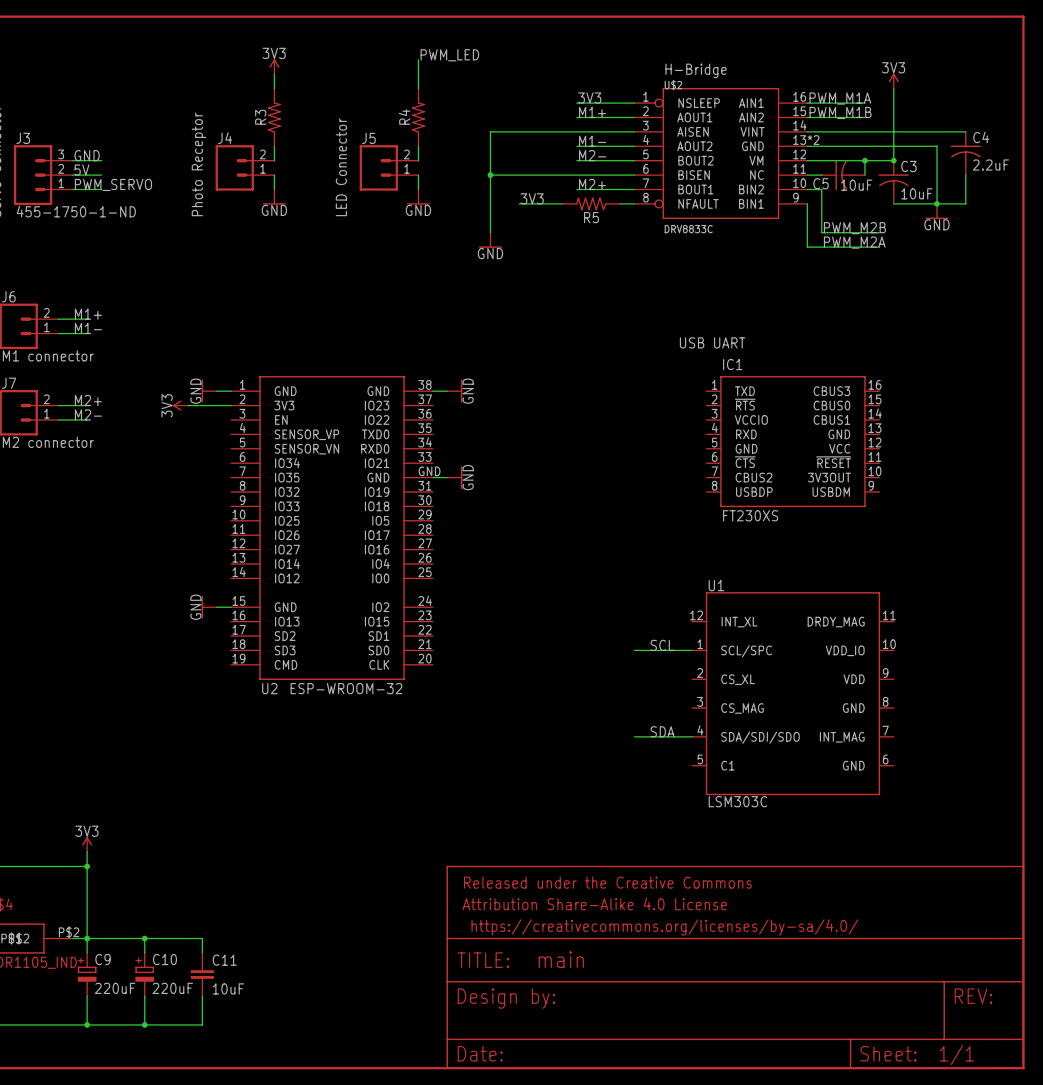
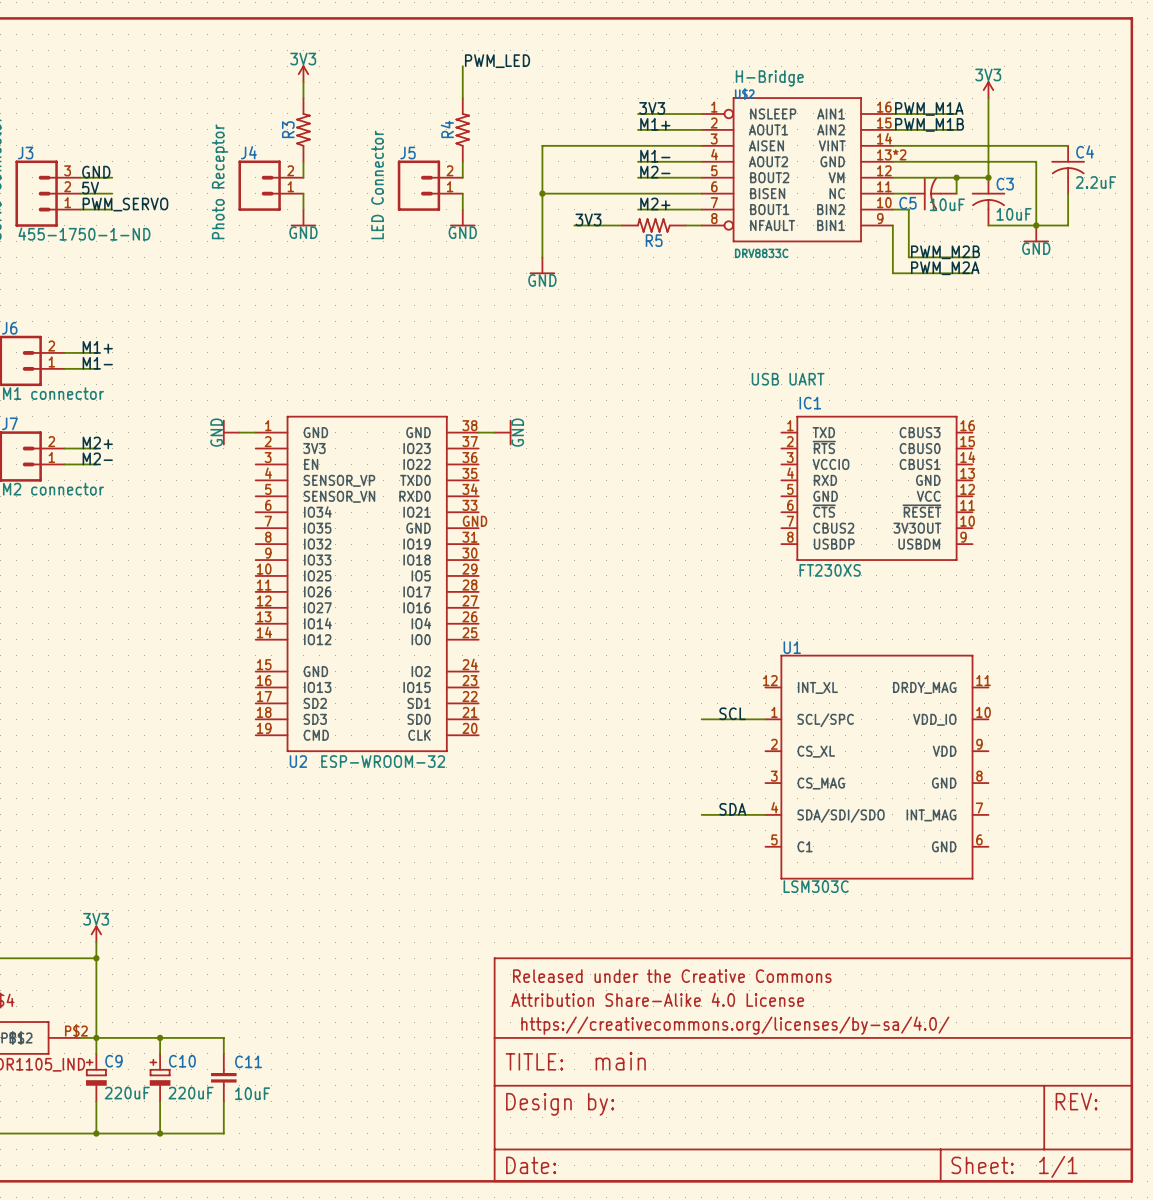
power symbol: 3V3 (180, 405) -> none
wire: (187, 405) (231, 405) -> none
wire: (432, 477) (447, 477) -> none
power symbol: GND (454, 477) -> none
power symbol: GND (209, 607) -> none
wire: (216, 607) (231, 607) -> none

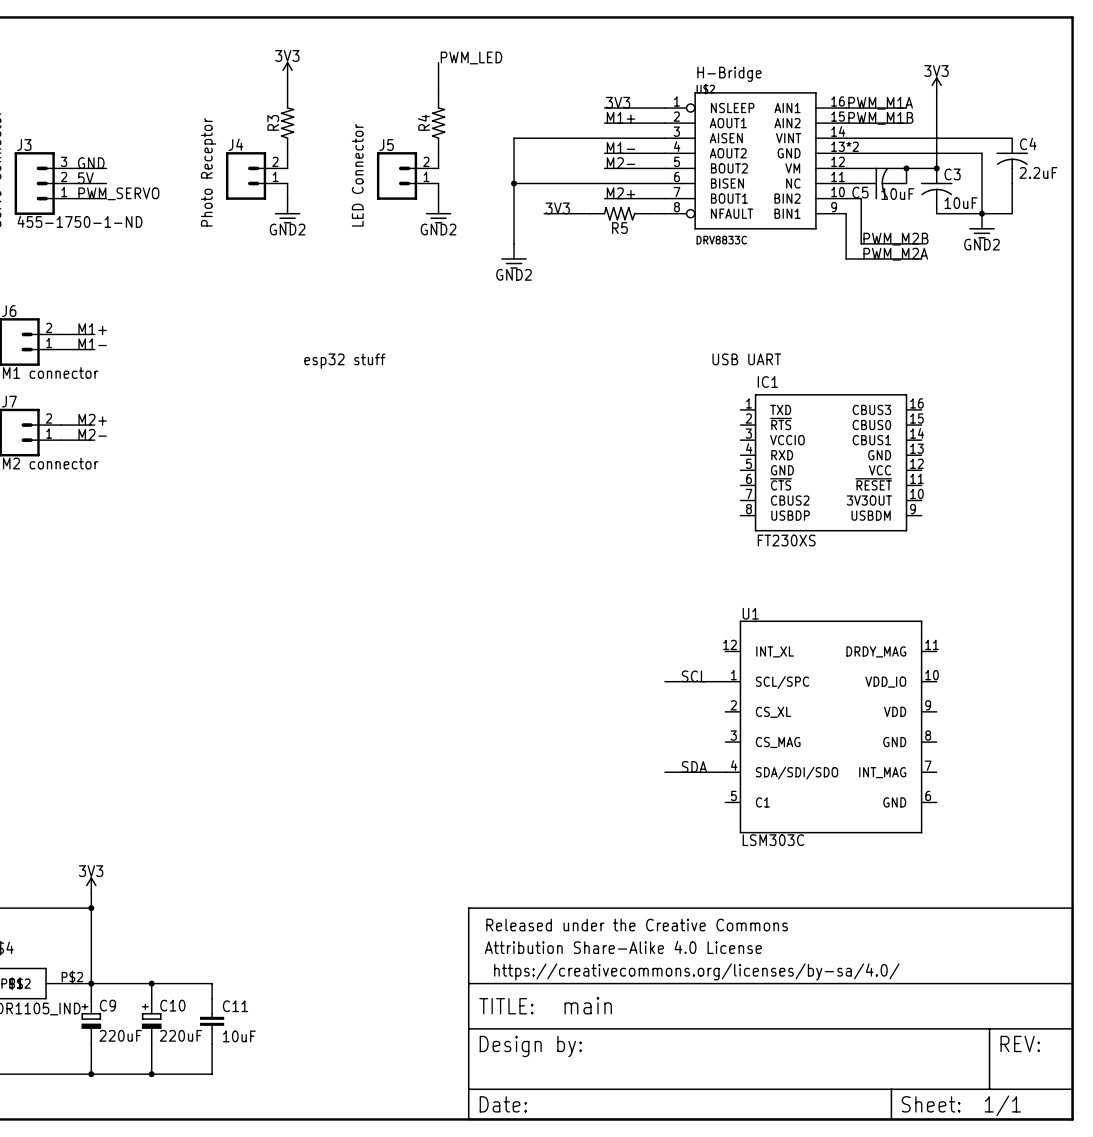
power symbol: GND (303, 217) -> GND2 (287, 211)
power symbol: GND (462, 217) -> GND2 (438, 211)
power symbol: GND (1036, 233) -> GND2 (981, 226)
power symbol: GND (542, 265) -> GND2 (514, 256)
text: none -> esp32 stuff (344, 361)
power symbol: GND (231, 432) -> none
wire: (239, 432) (255, 432) -> none
wire: (478, 432) (494, 432) -> none
power symbol: GND (502, 432) -> none
U2: ESP-WROOM-32 (367, 583) -> none

